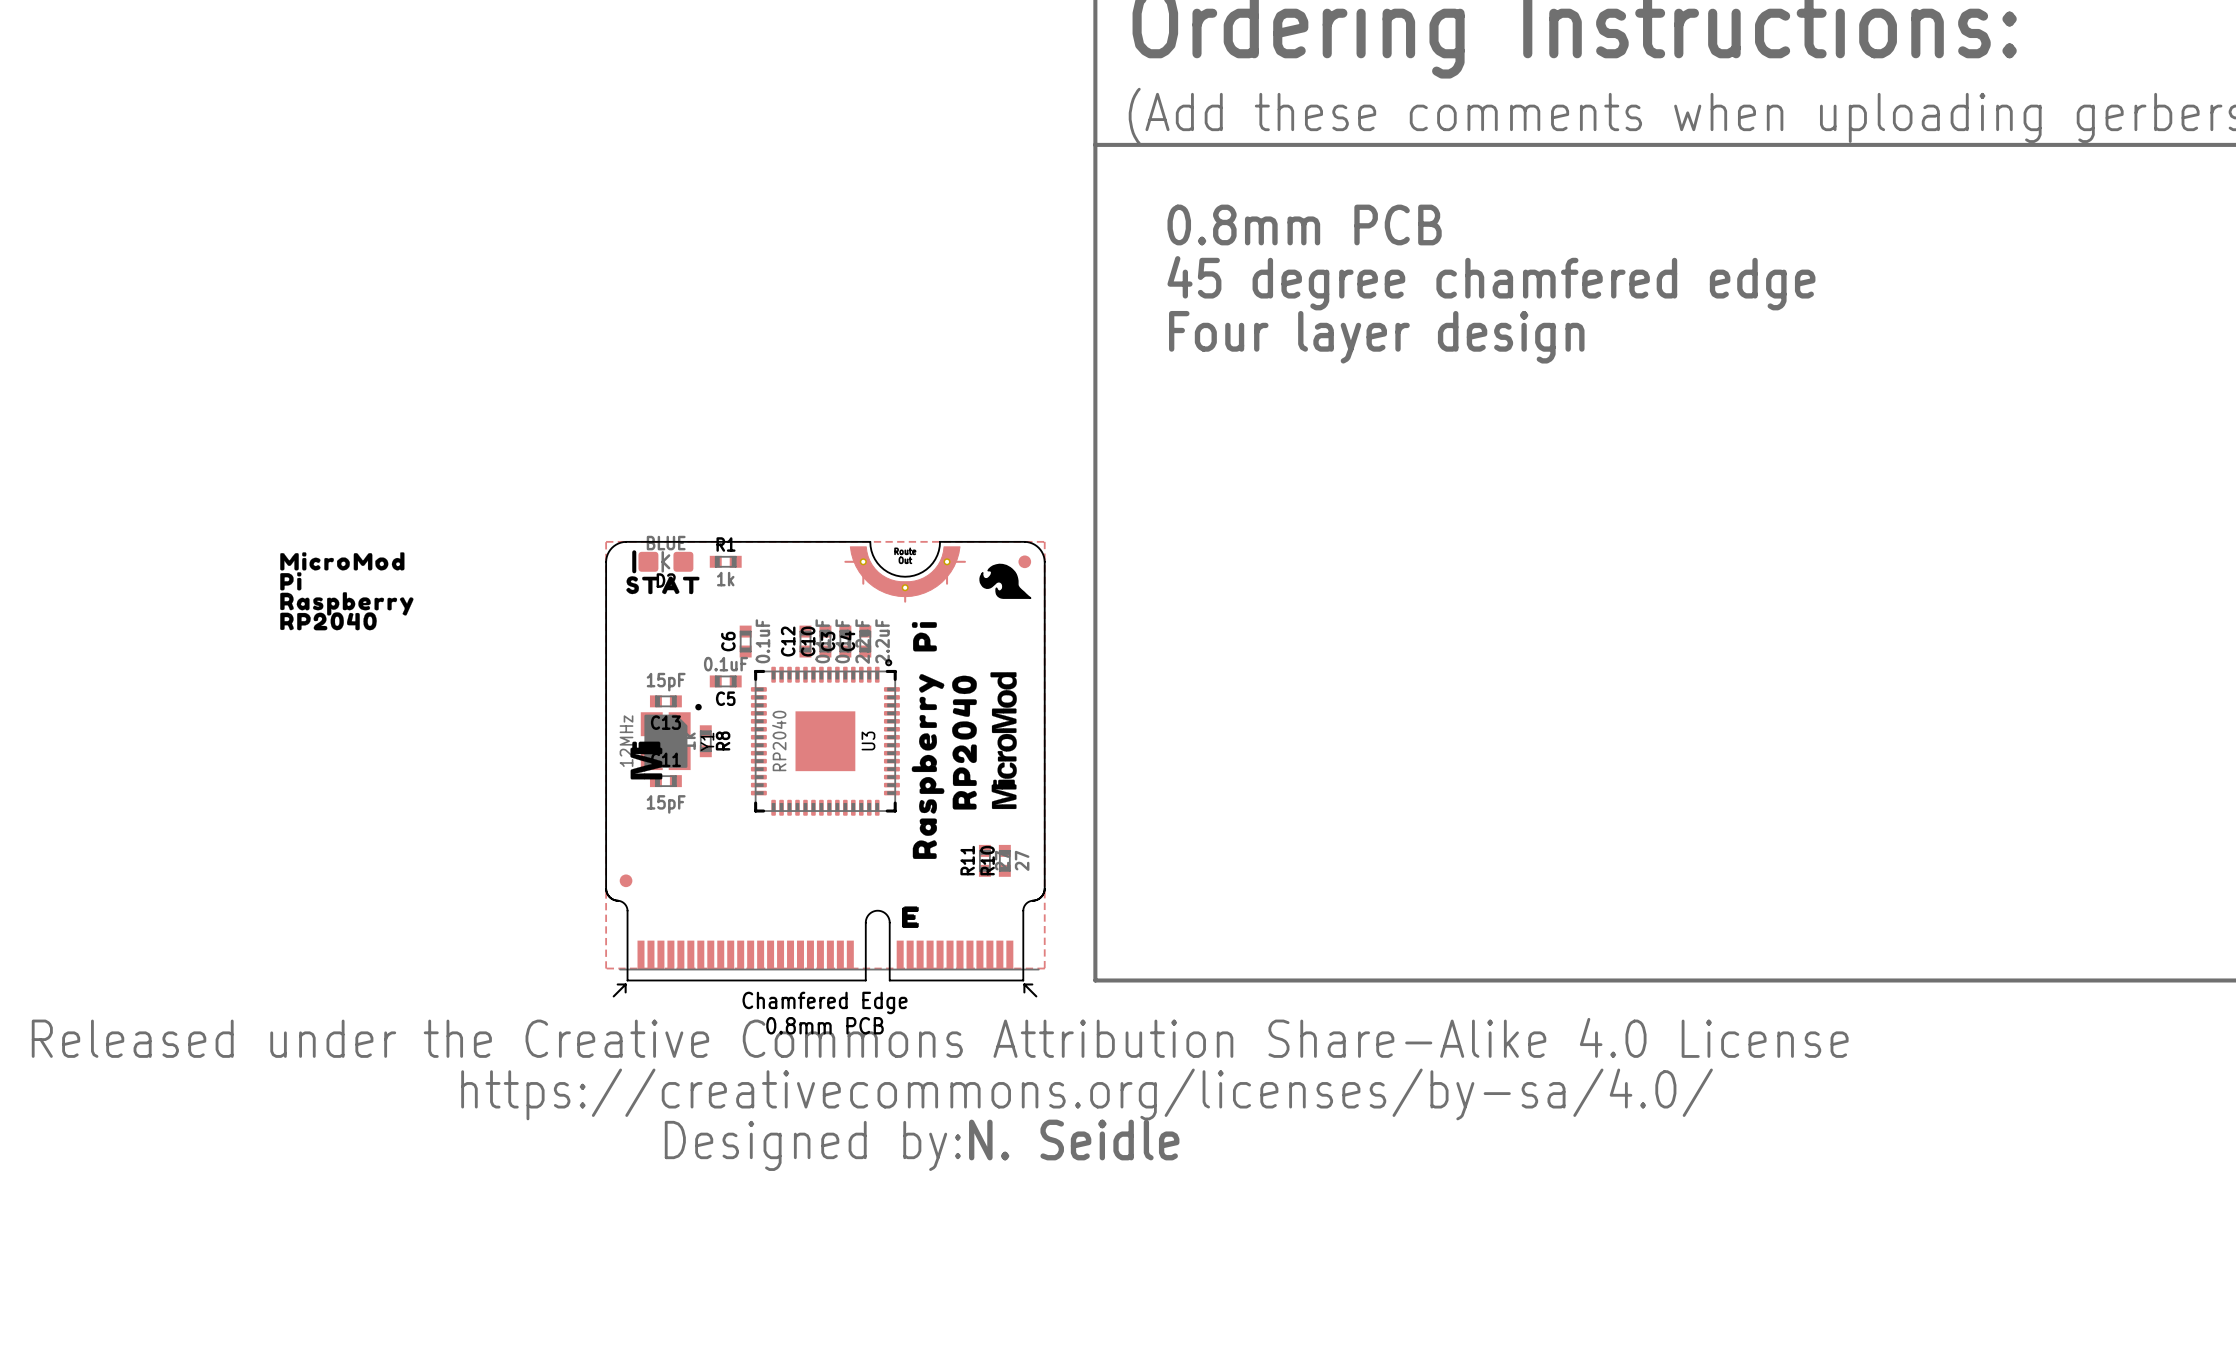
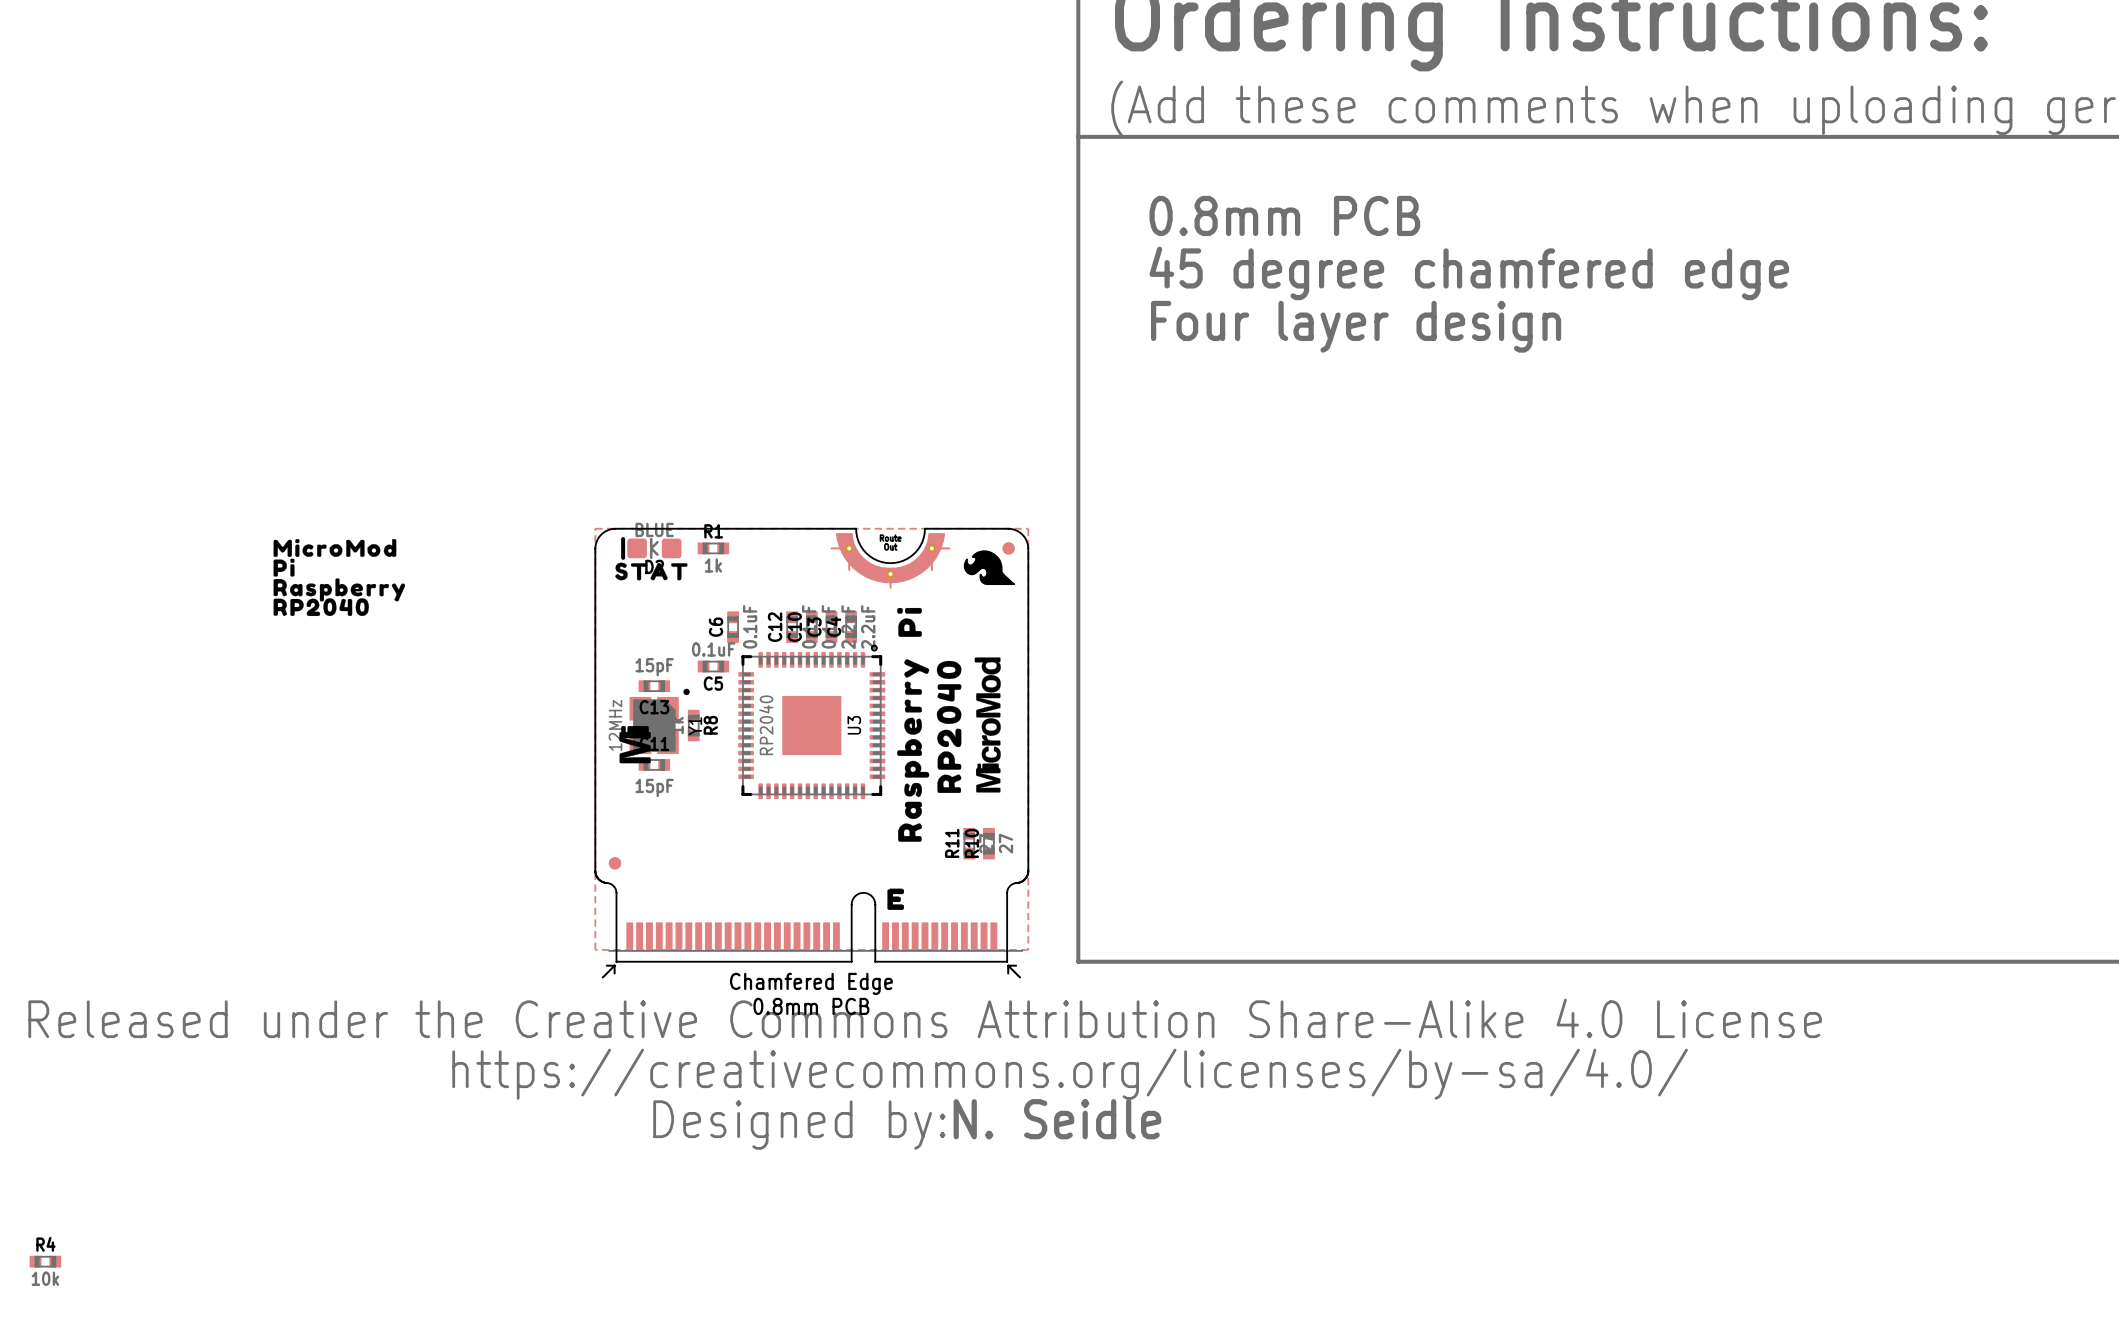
R4: none -> 10k (45, 1261)

